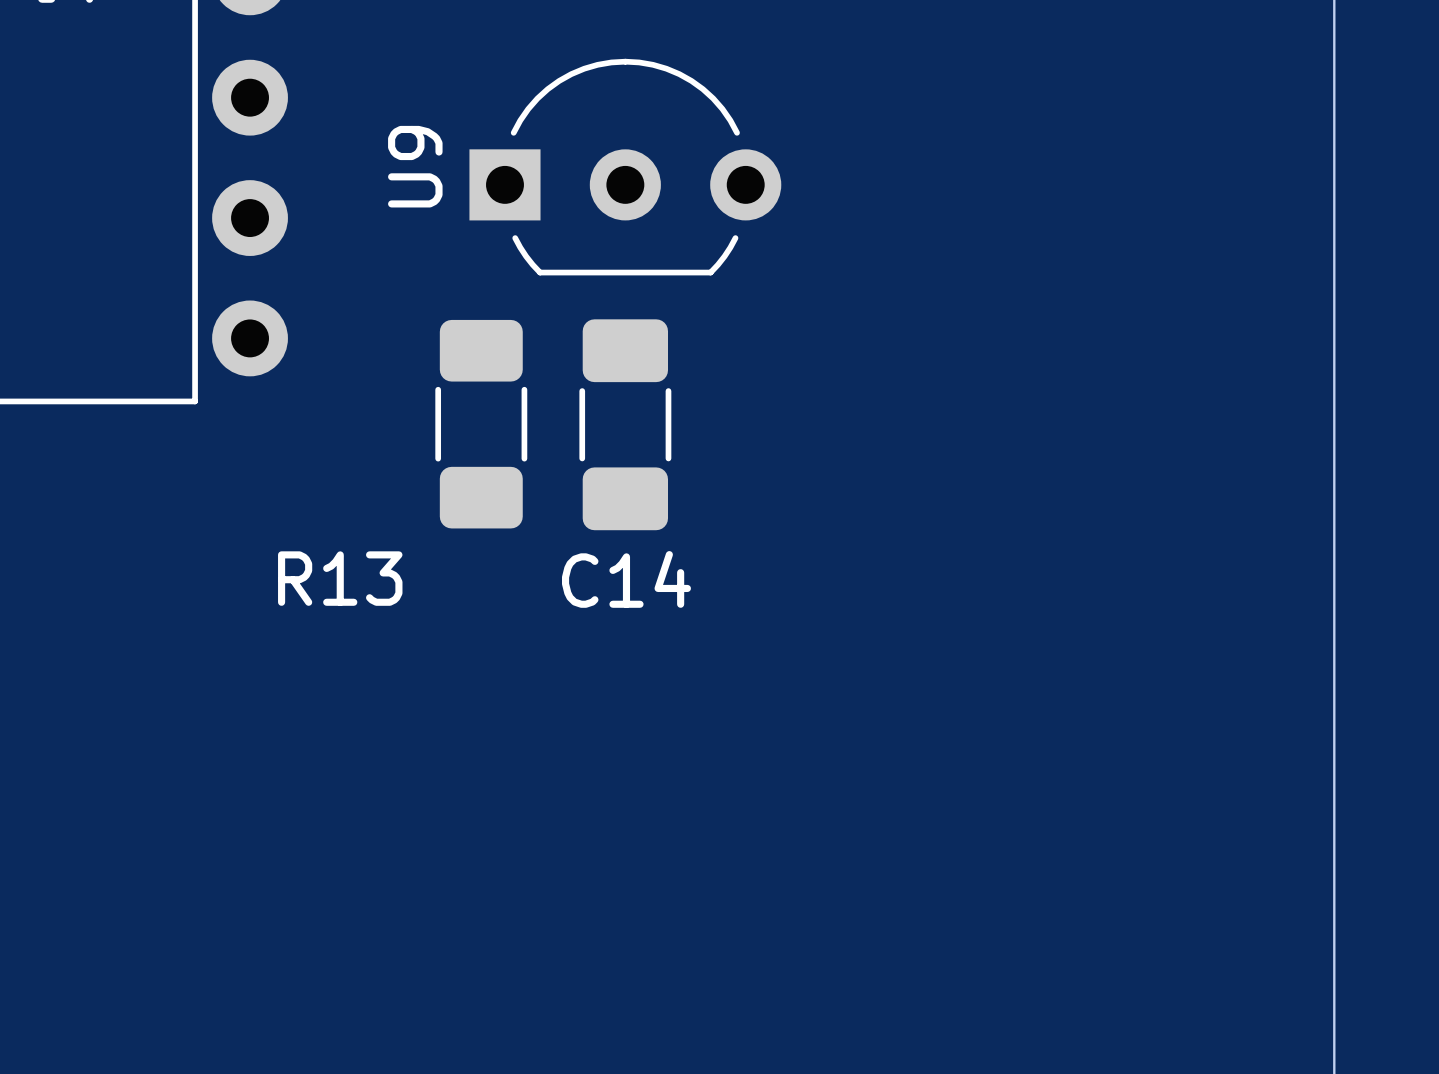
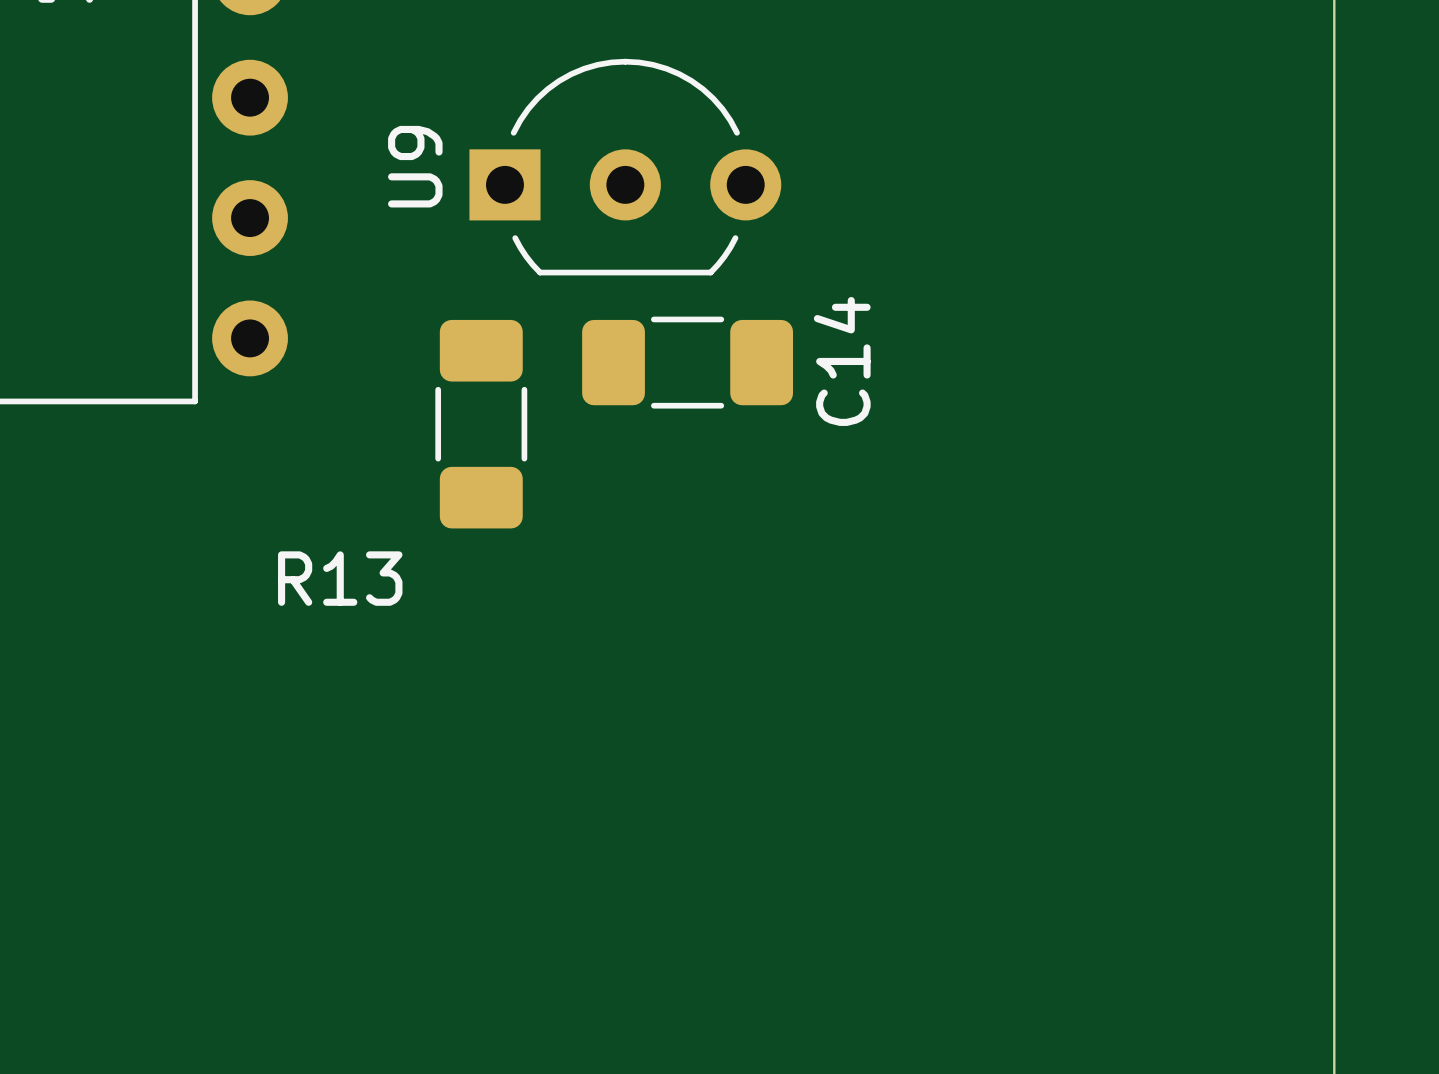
C14 rotation: 0° (625, 424) -> 90° clockwise (687, 362)
C14 name position: C14 (626, 579) -> C14 (842, 361)

